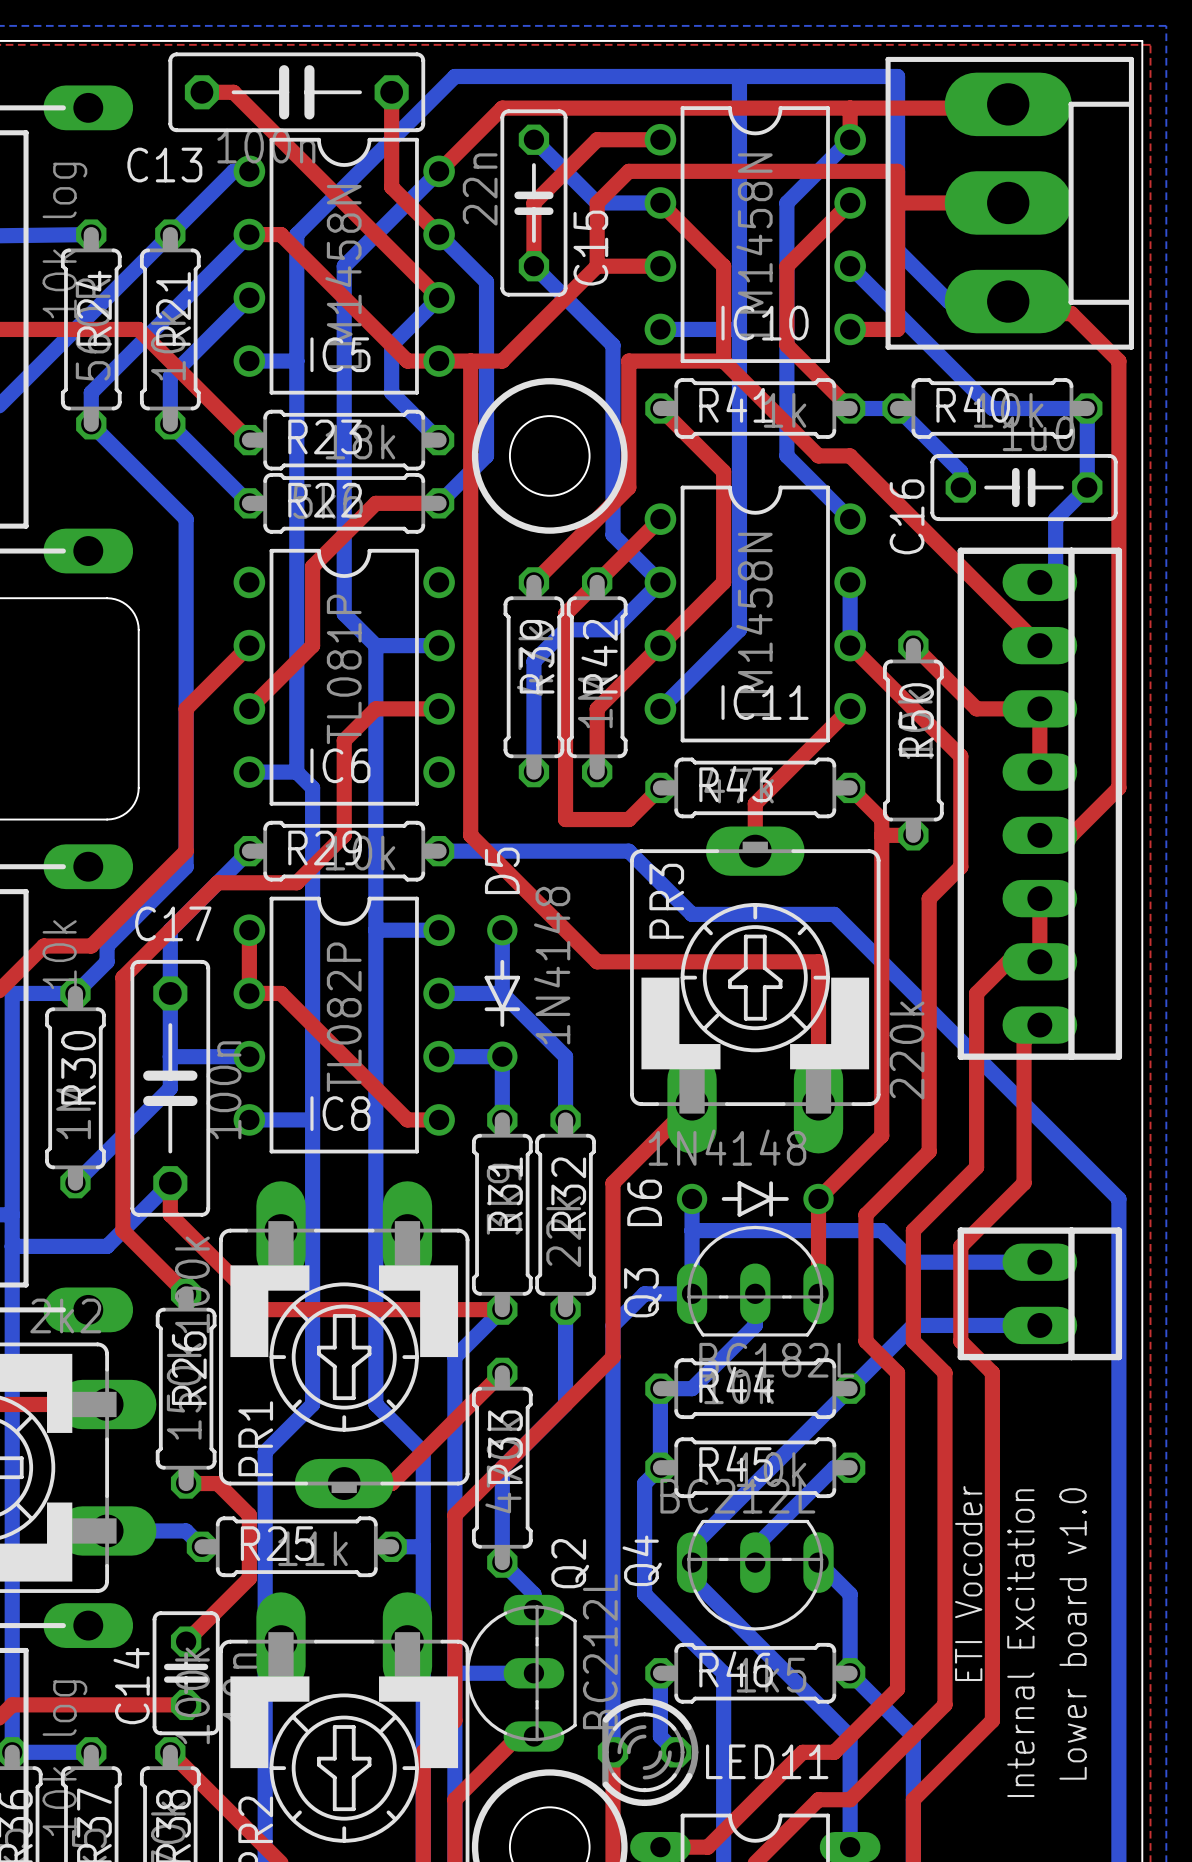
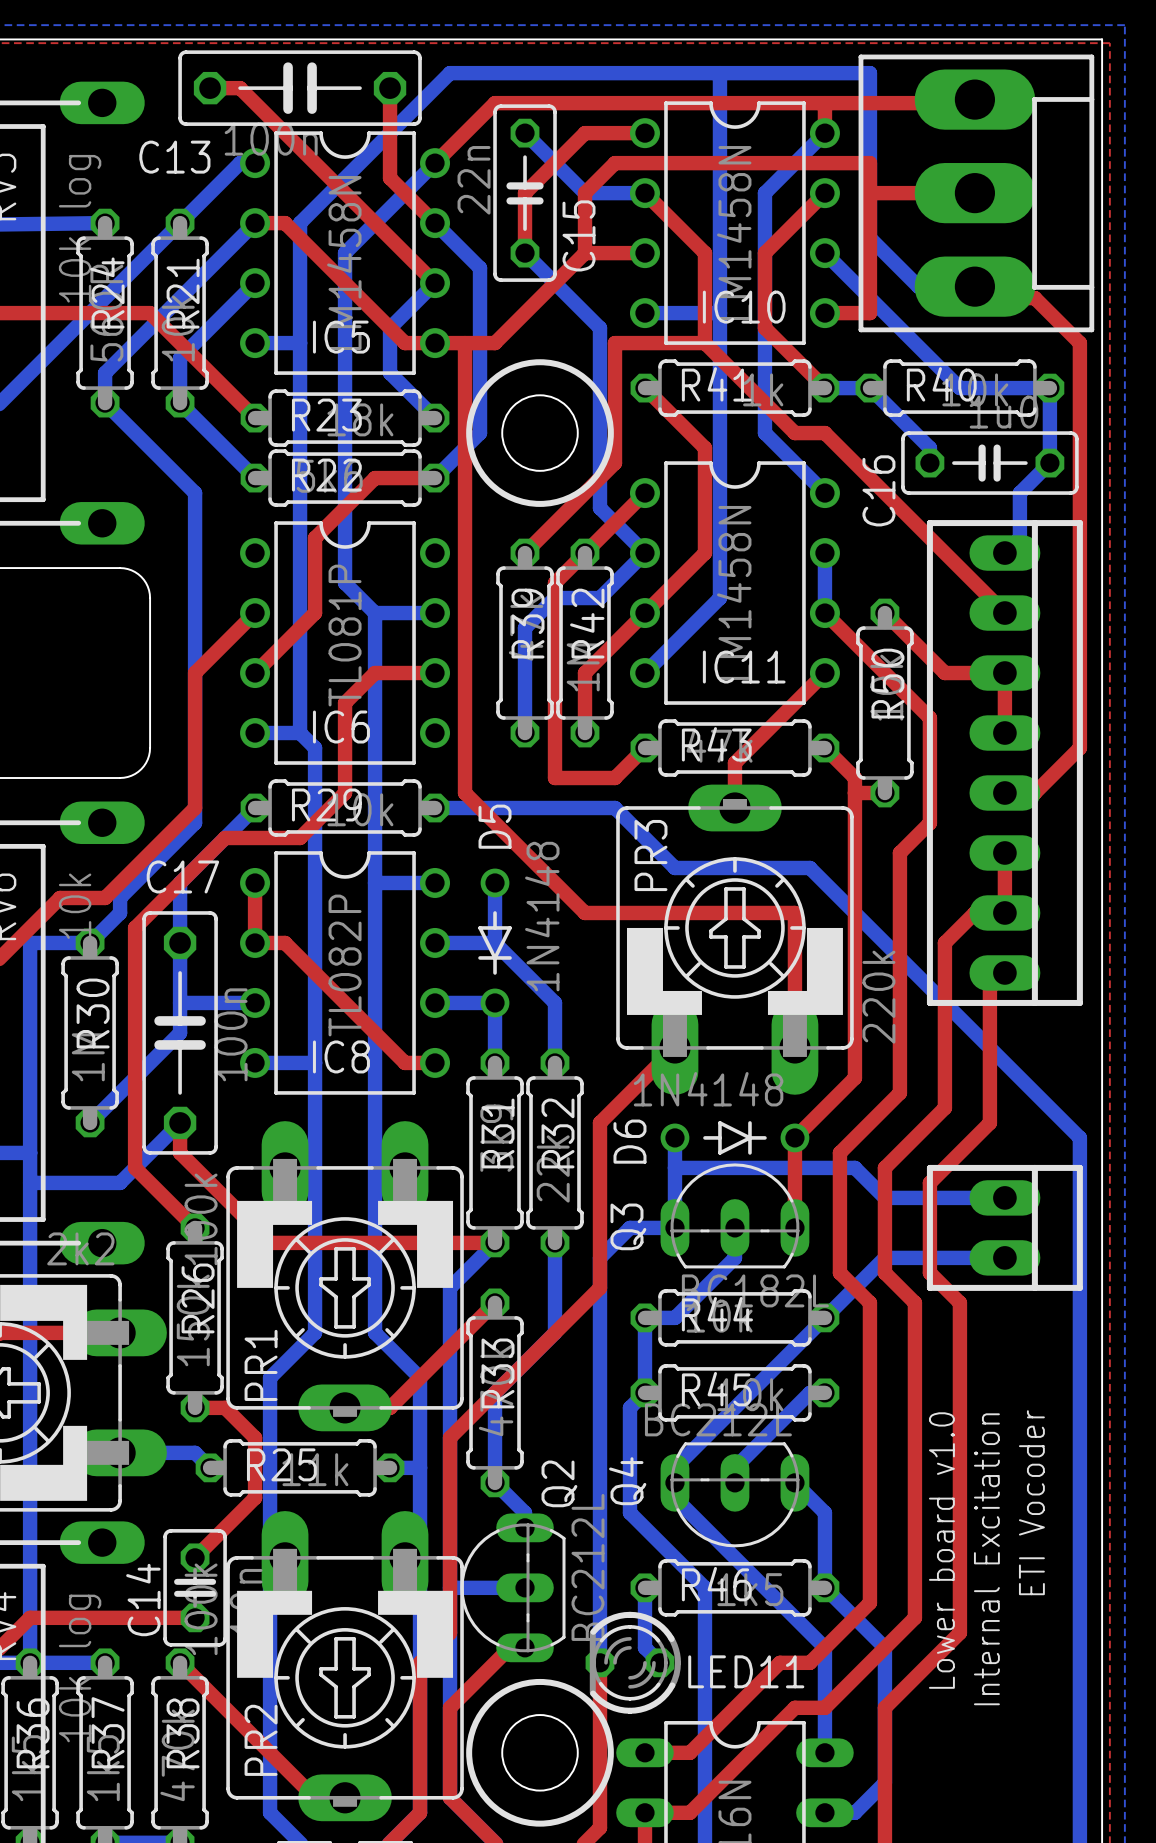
text position: ETI Vocoder (968, 1583) -> ETI Vocoder (1031, 1502)
text position: Lower board v1.0 (1073, 1633) -> Lower board v1.0 (941, 1550)

